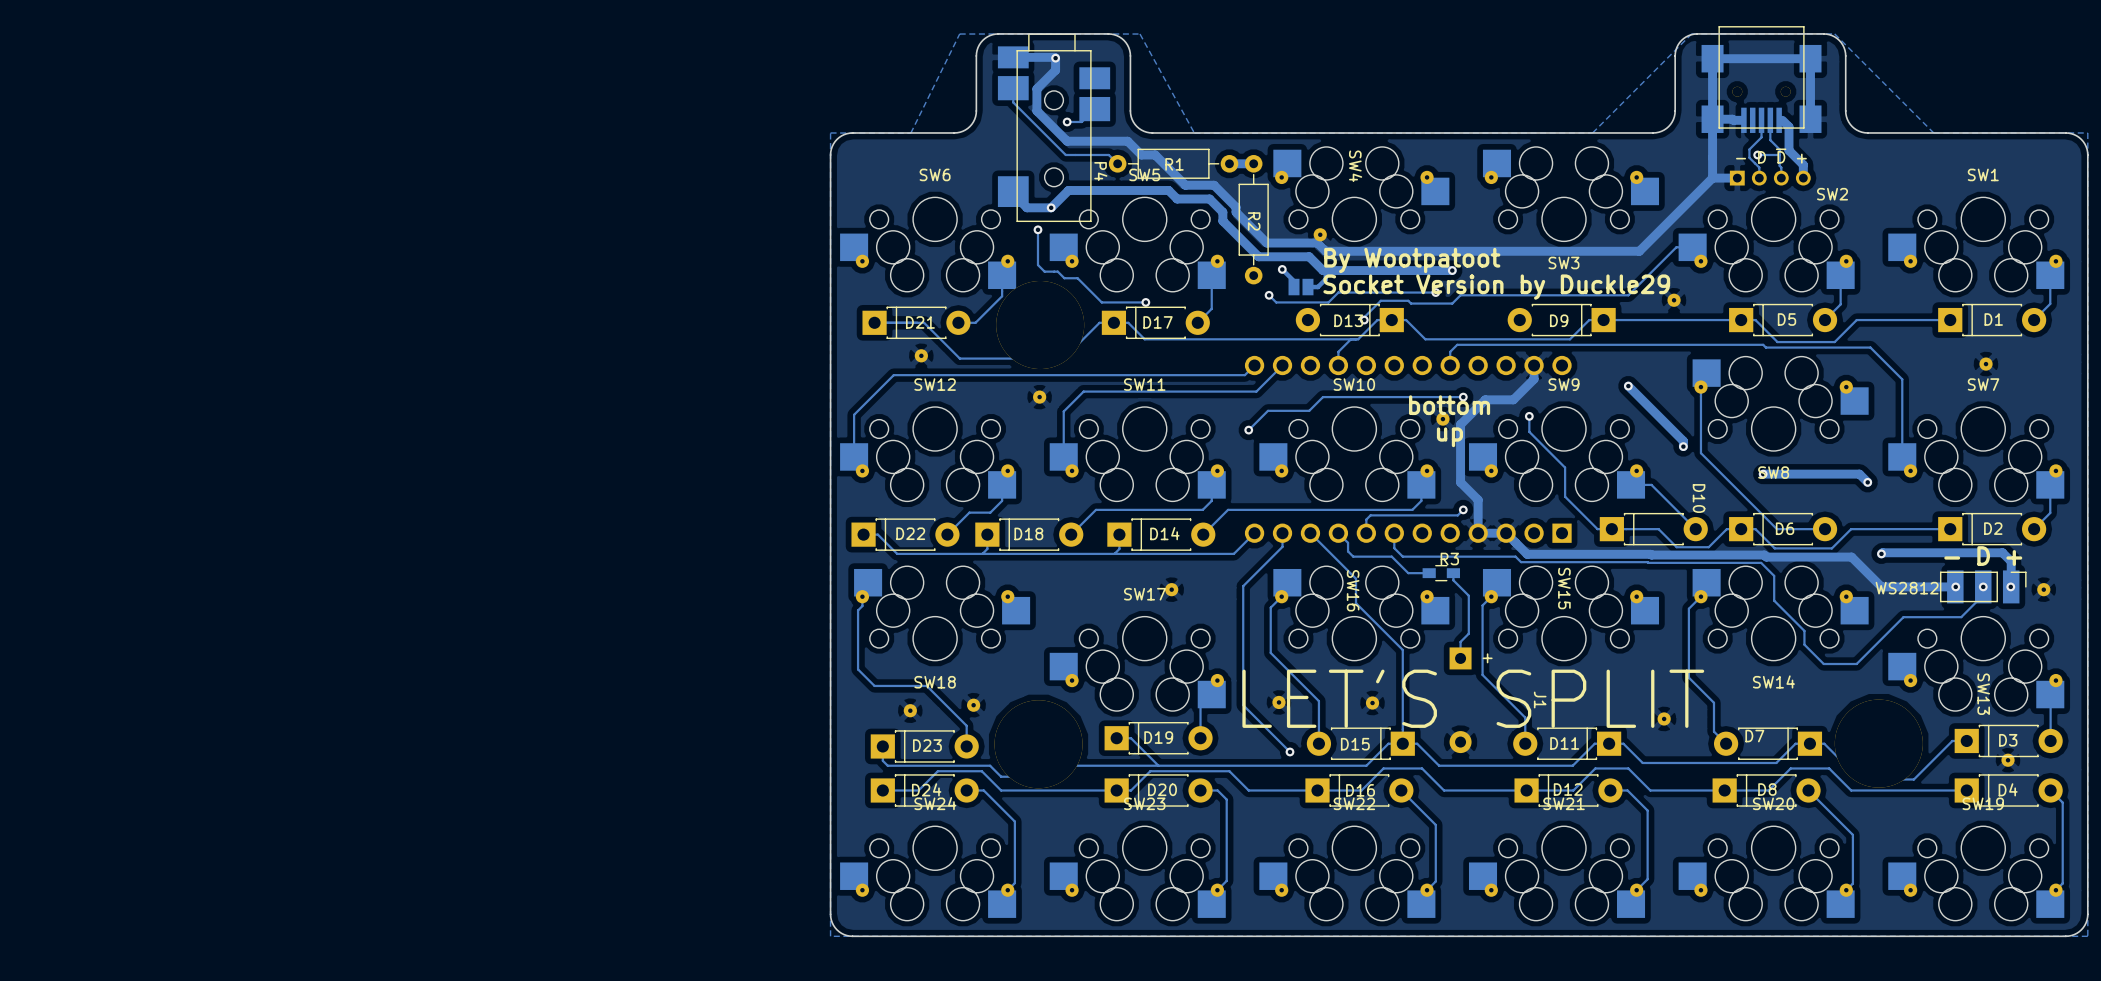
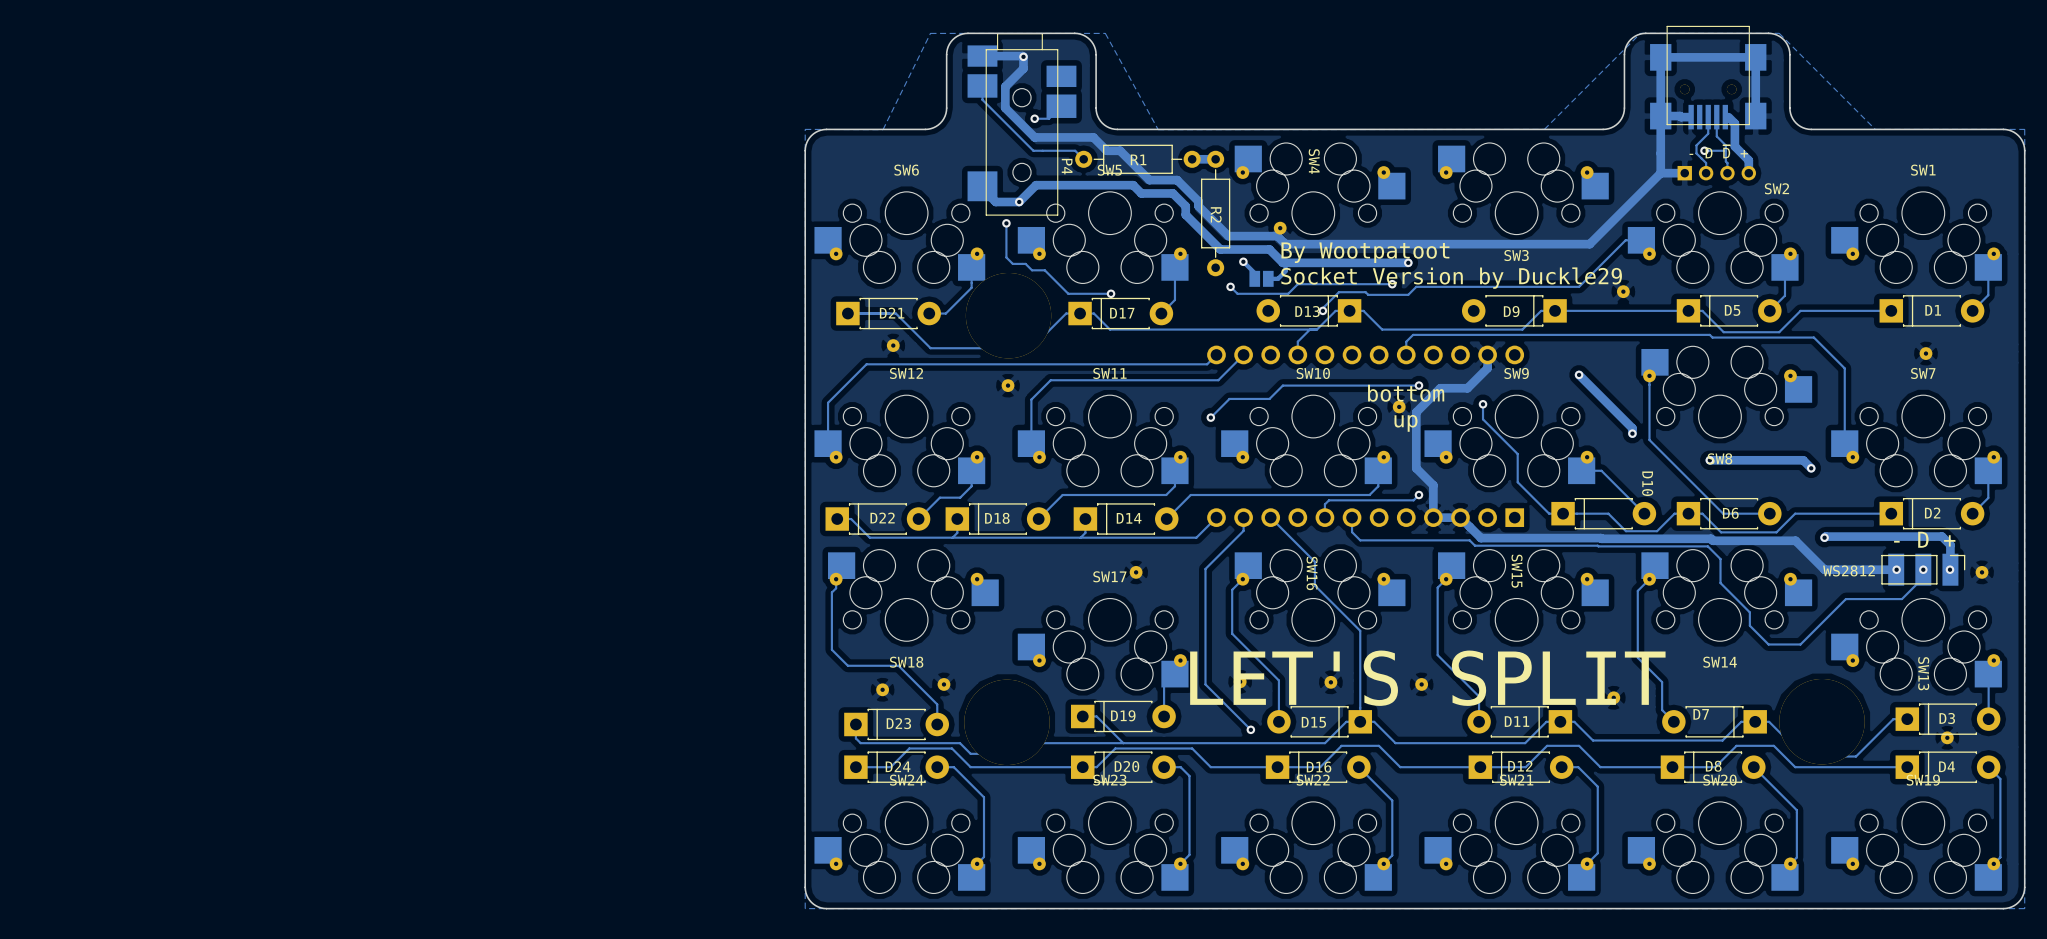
track: (1338, 533) (1348, 542) (1348, 551) (1353, 556) (1391, 556) (1408, 573) (1429, 573) -> none
R3: (1441, 573) -> none
track: (1453, 573) (1453, 580) (1468, 595) (1468, 633) (1460, 641) (1460, 658) -> none
J1: (1460, 700) -> none
part: none -> (1421, 684)

